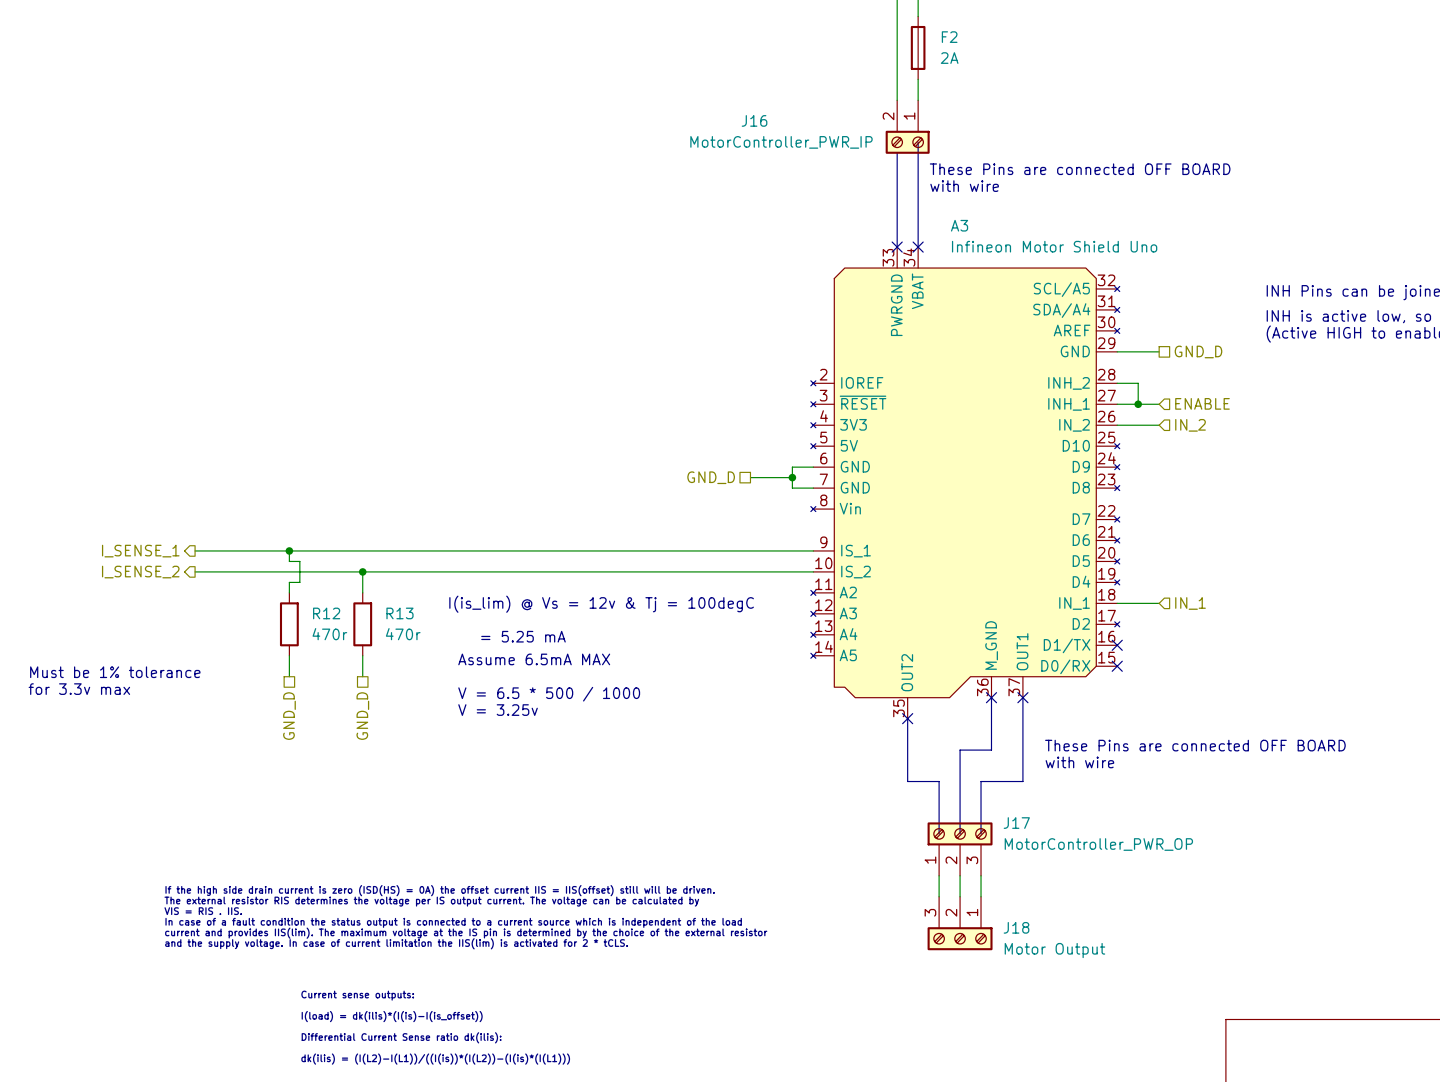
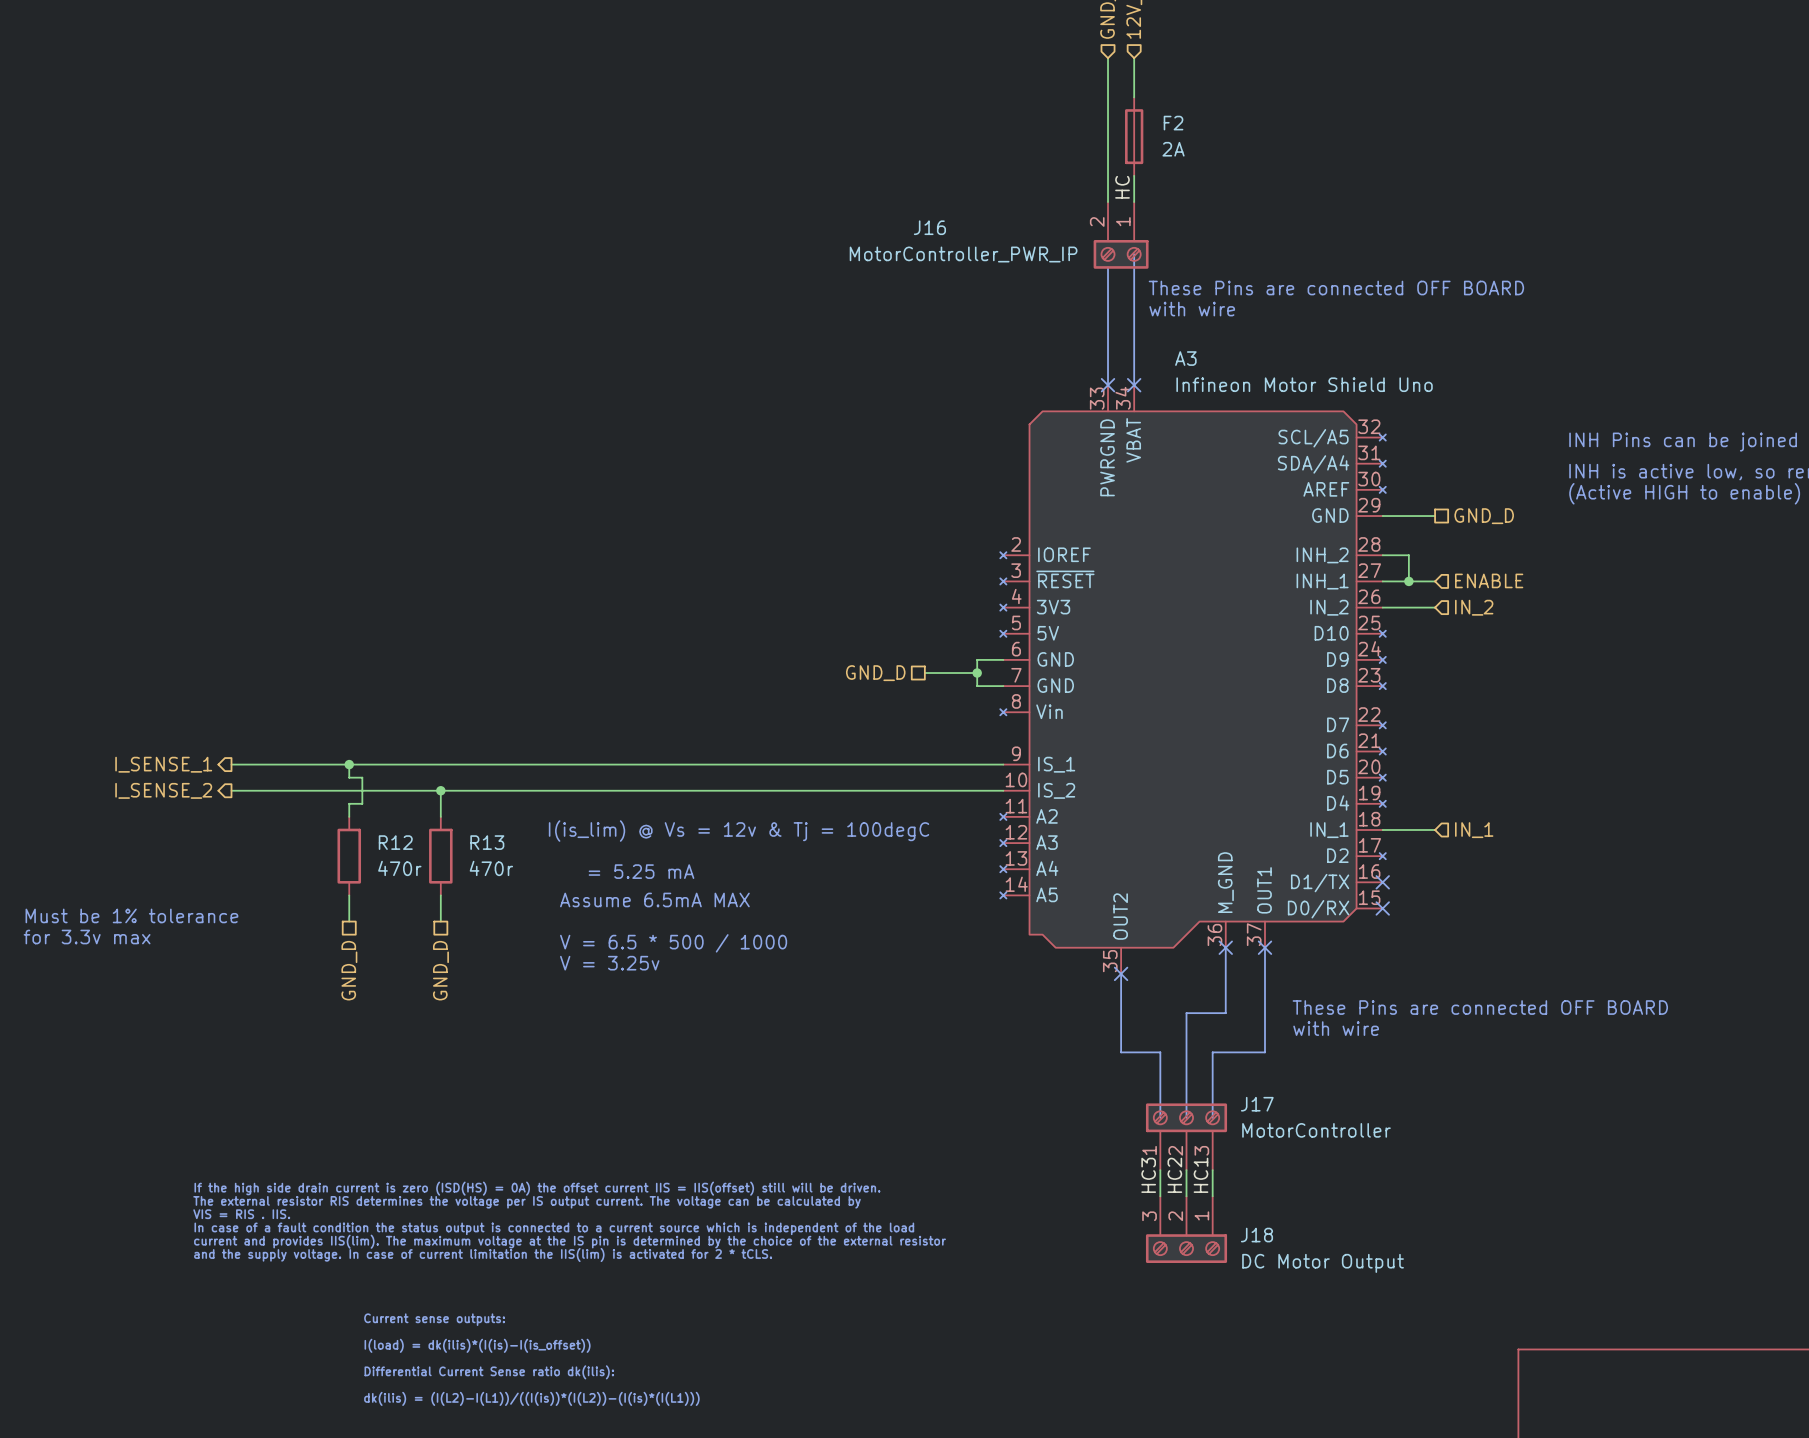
label: none -> HC (1122, 187)
J17 value: MotorController_PWR_OP (1098, 844) -> MotorController (1316, 1130)
label: none -> HC3 (1148, 1175)
label: none -> HC2 (1174, 1175)
label: none -> HC1 (1200, 1175)
J18 value: Motor Output (1054, 950) -> DC Motor Output (1323, 1263)

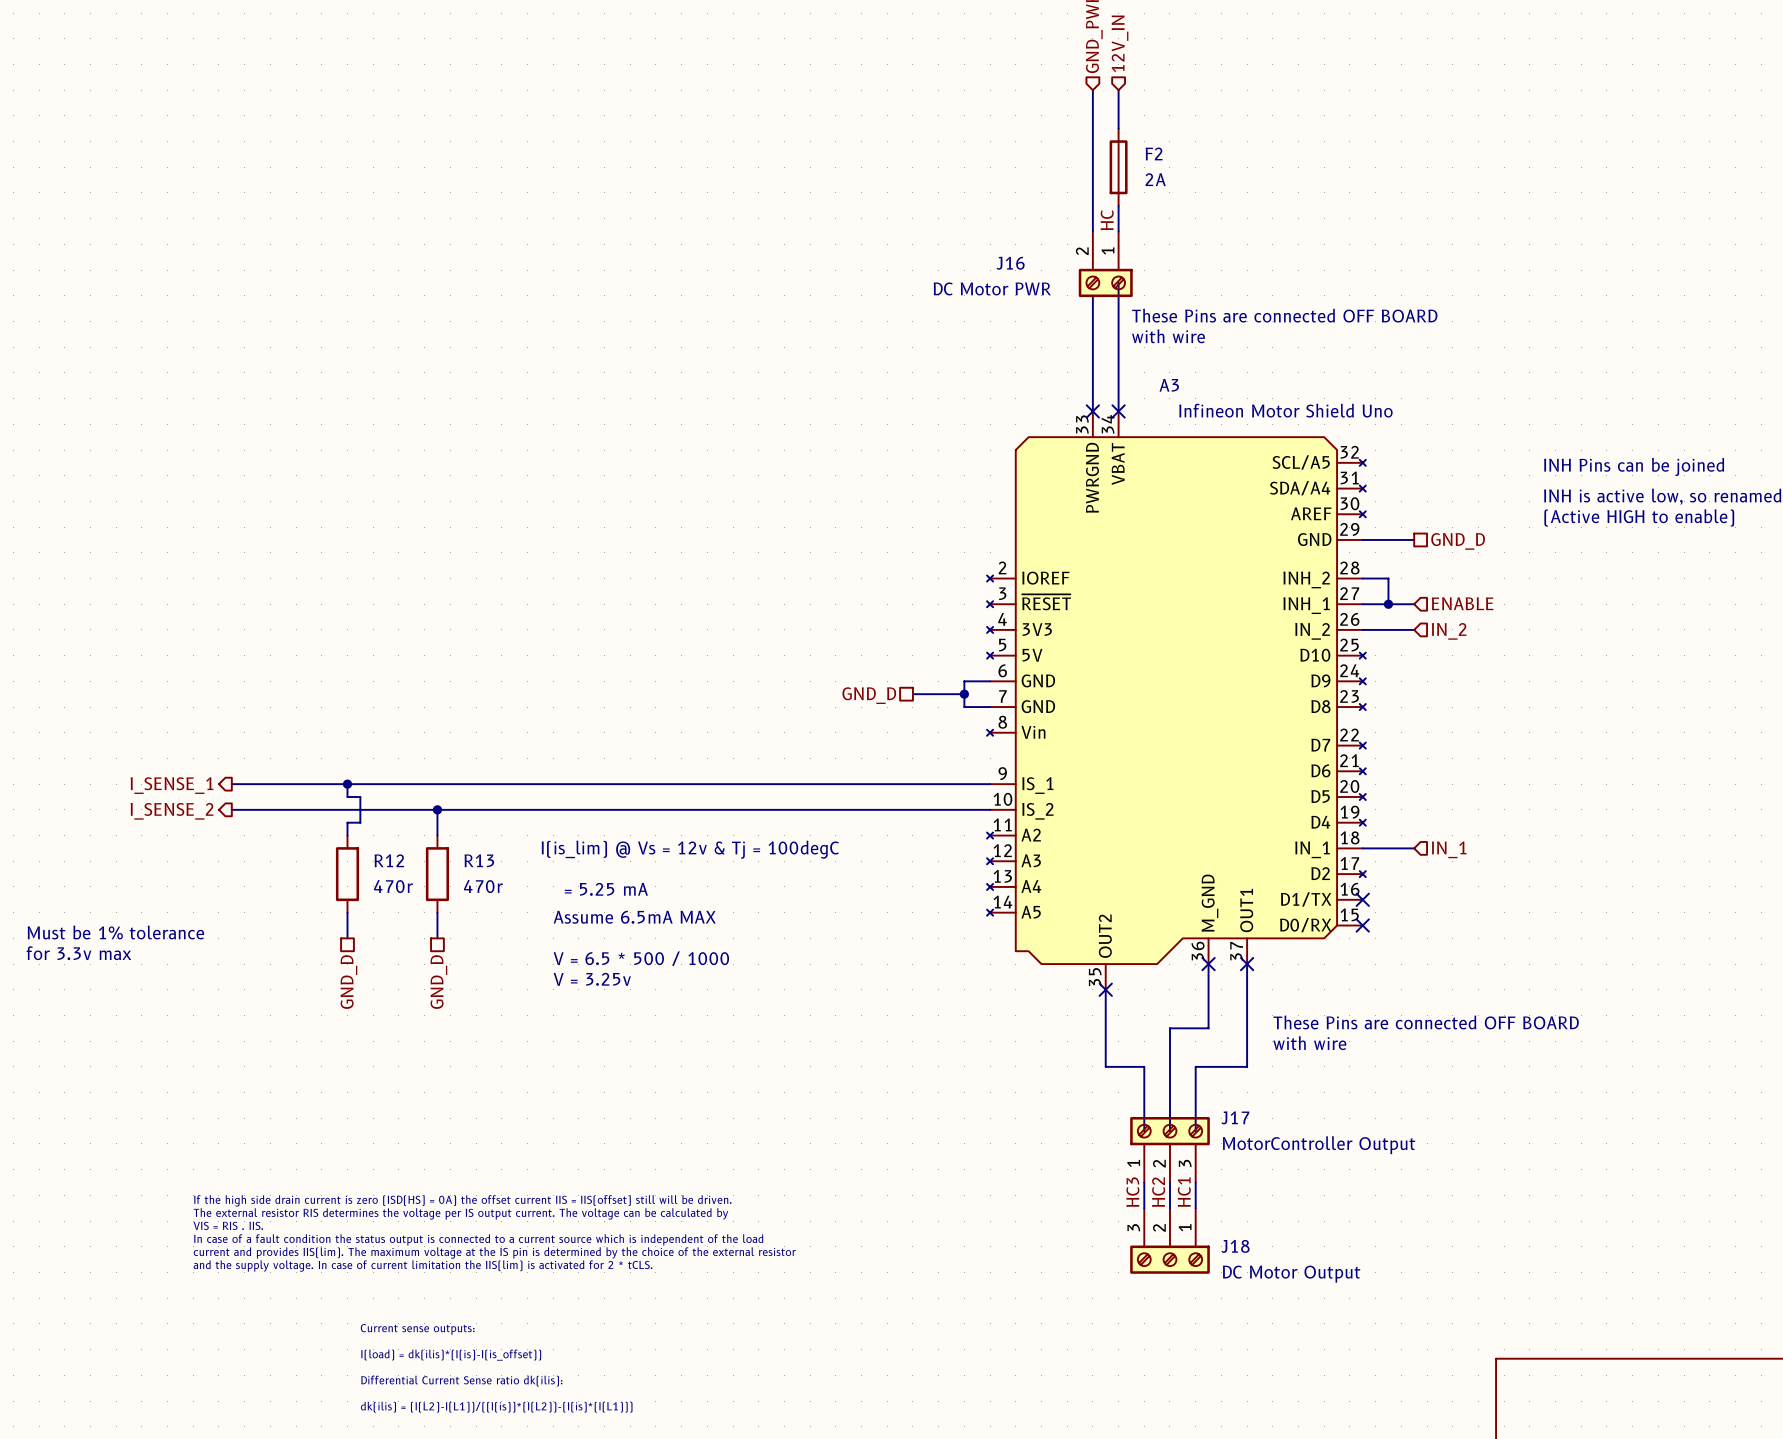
J16 name position: J16 (929, 227) -> J16 (1010, 263)
J16 value: MotorController_PWR_IP (963, 254) -> DC Motor PWR (992, 288)
J17 value: MotorController (1316, 1130) -> MotorController Output (1319, 1145)

